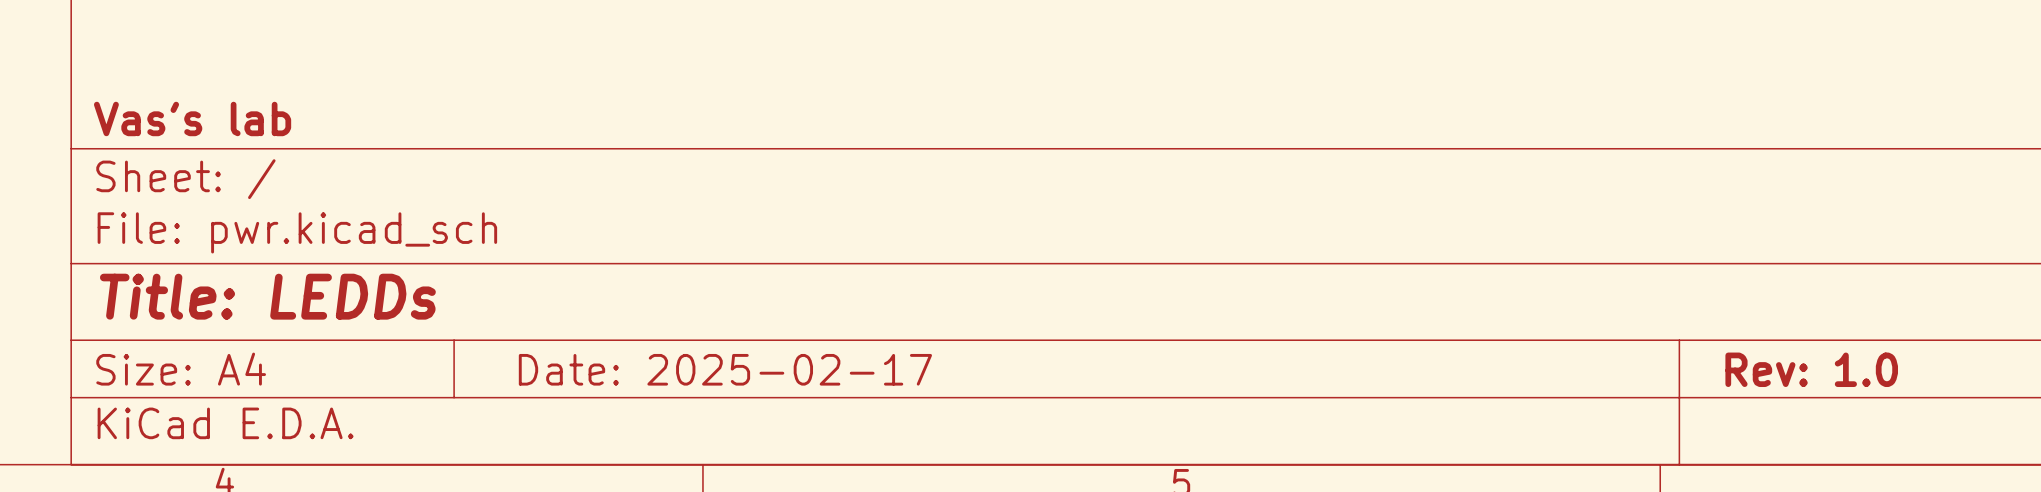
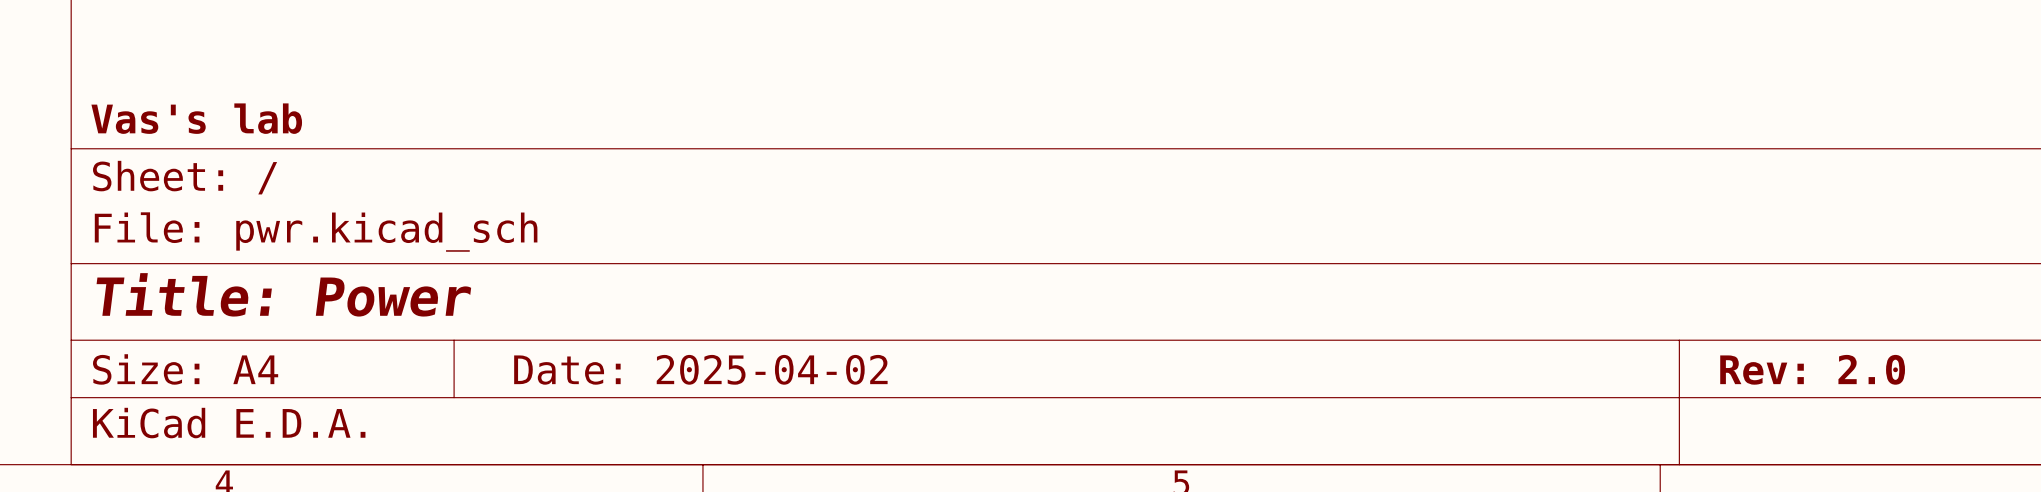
title block: Title: LEDDs (267, 296) -> Title: Power (283, 294)
title block: Date: 2025-02-17 (725, 369) -> Date: 2025-04-02 (700, 369)
title block: Rev: 1.0 (1811, 369) -> Rev: 2.0 (1812, 369)

